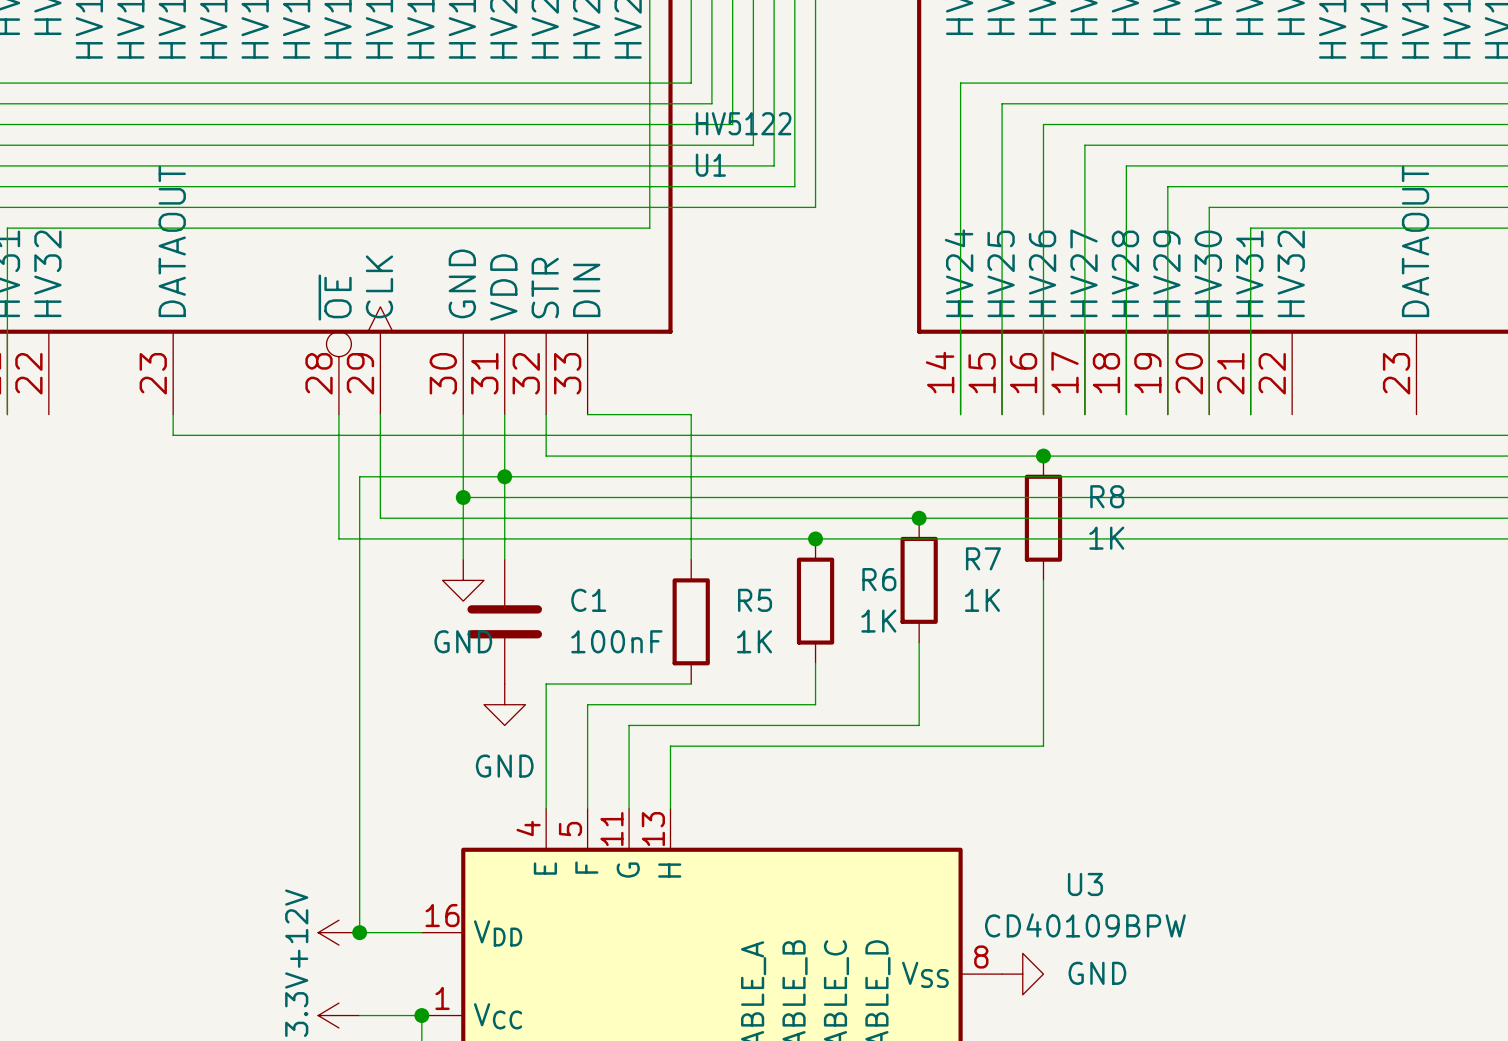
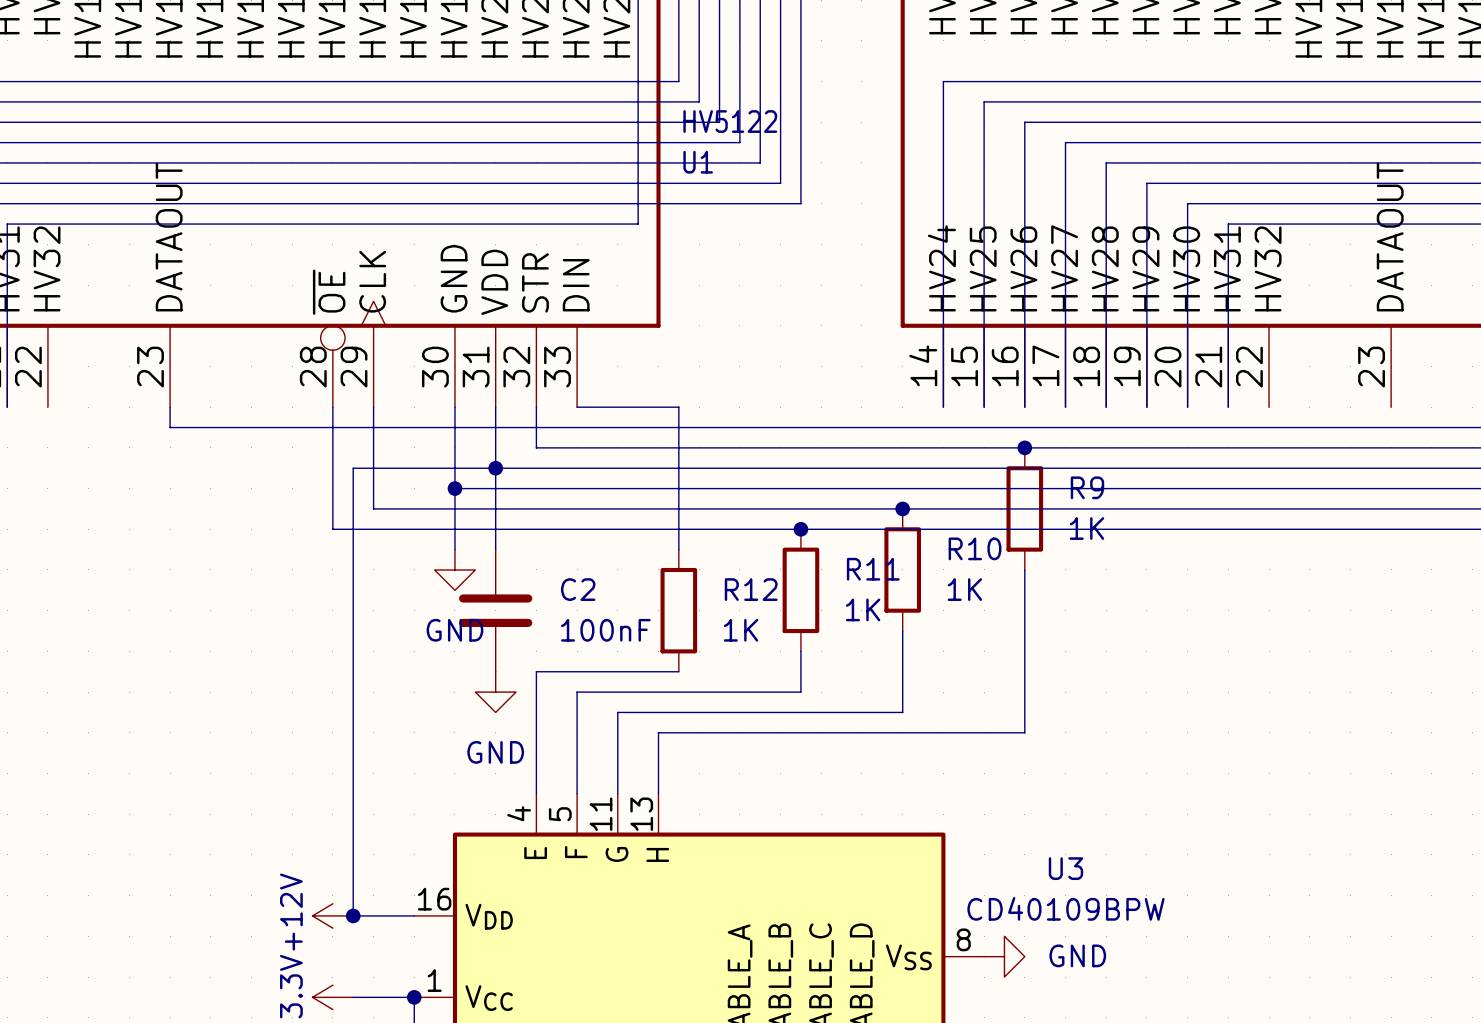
R8 name: R8 (1107, 496) -> R9 (1087, 487)
R7 name: R7 (983, 558) -> R10 (975, 548)
R6 name: R6 (879, 579) -> R11 (873, 569)
C1 name: C1 (588, 600) -> C2 (578, 589)
R5 name: R5 (755, 600) -> R12 (751, 589)

